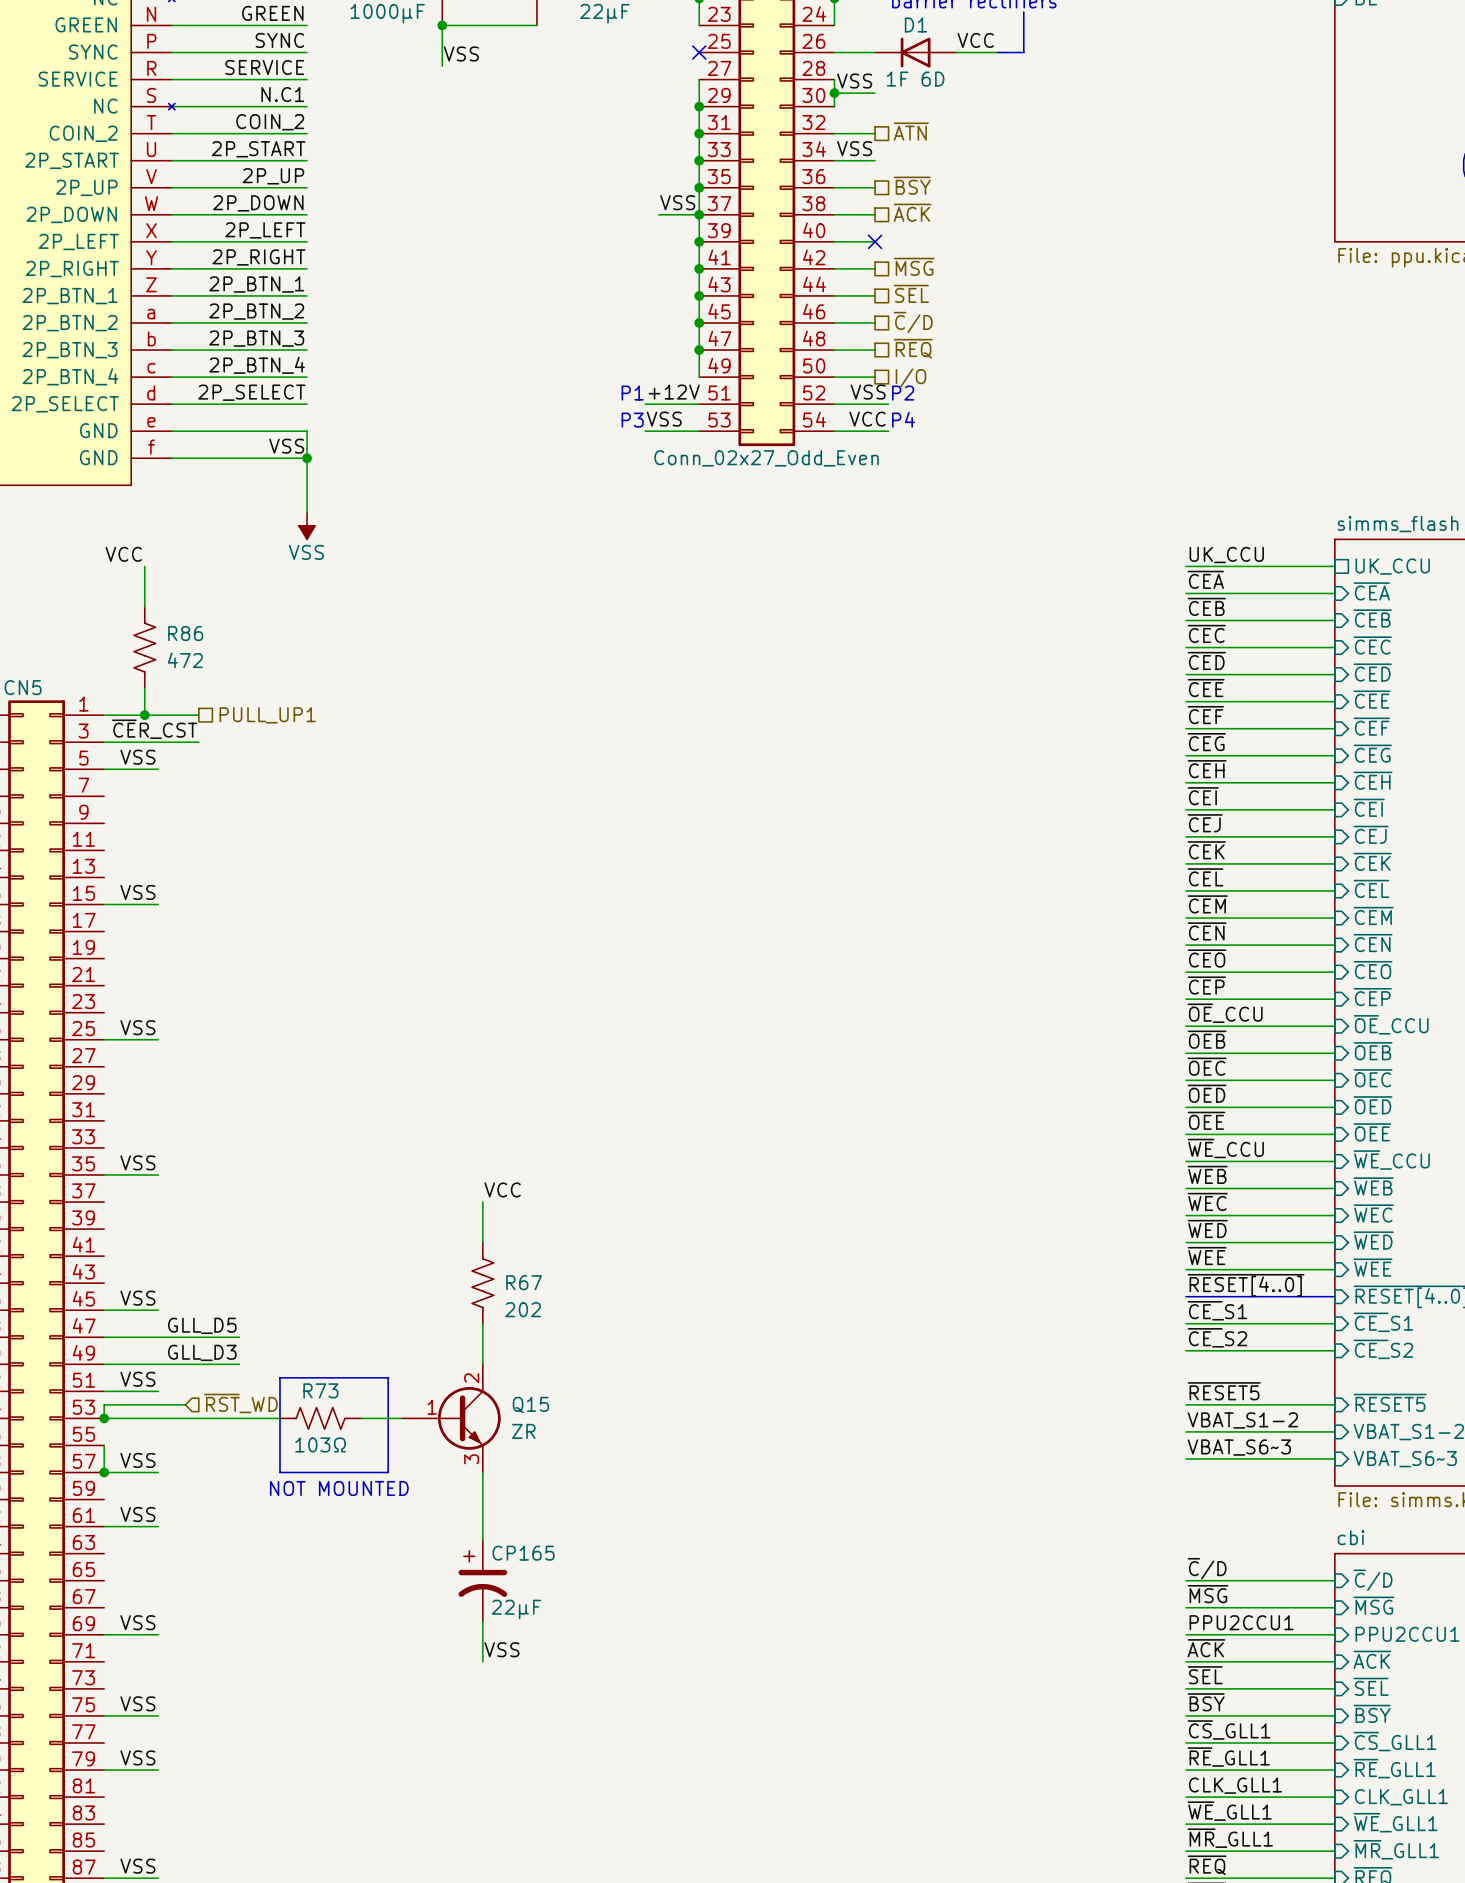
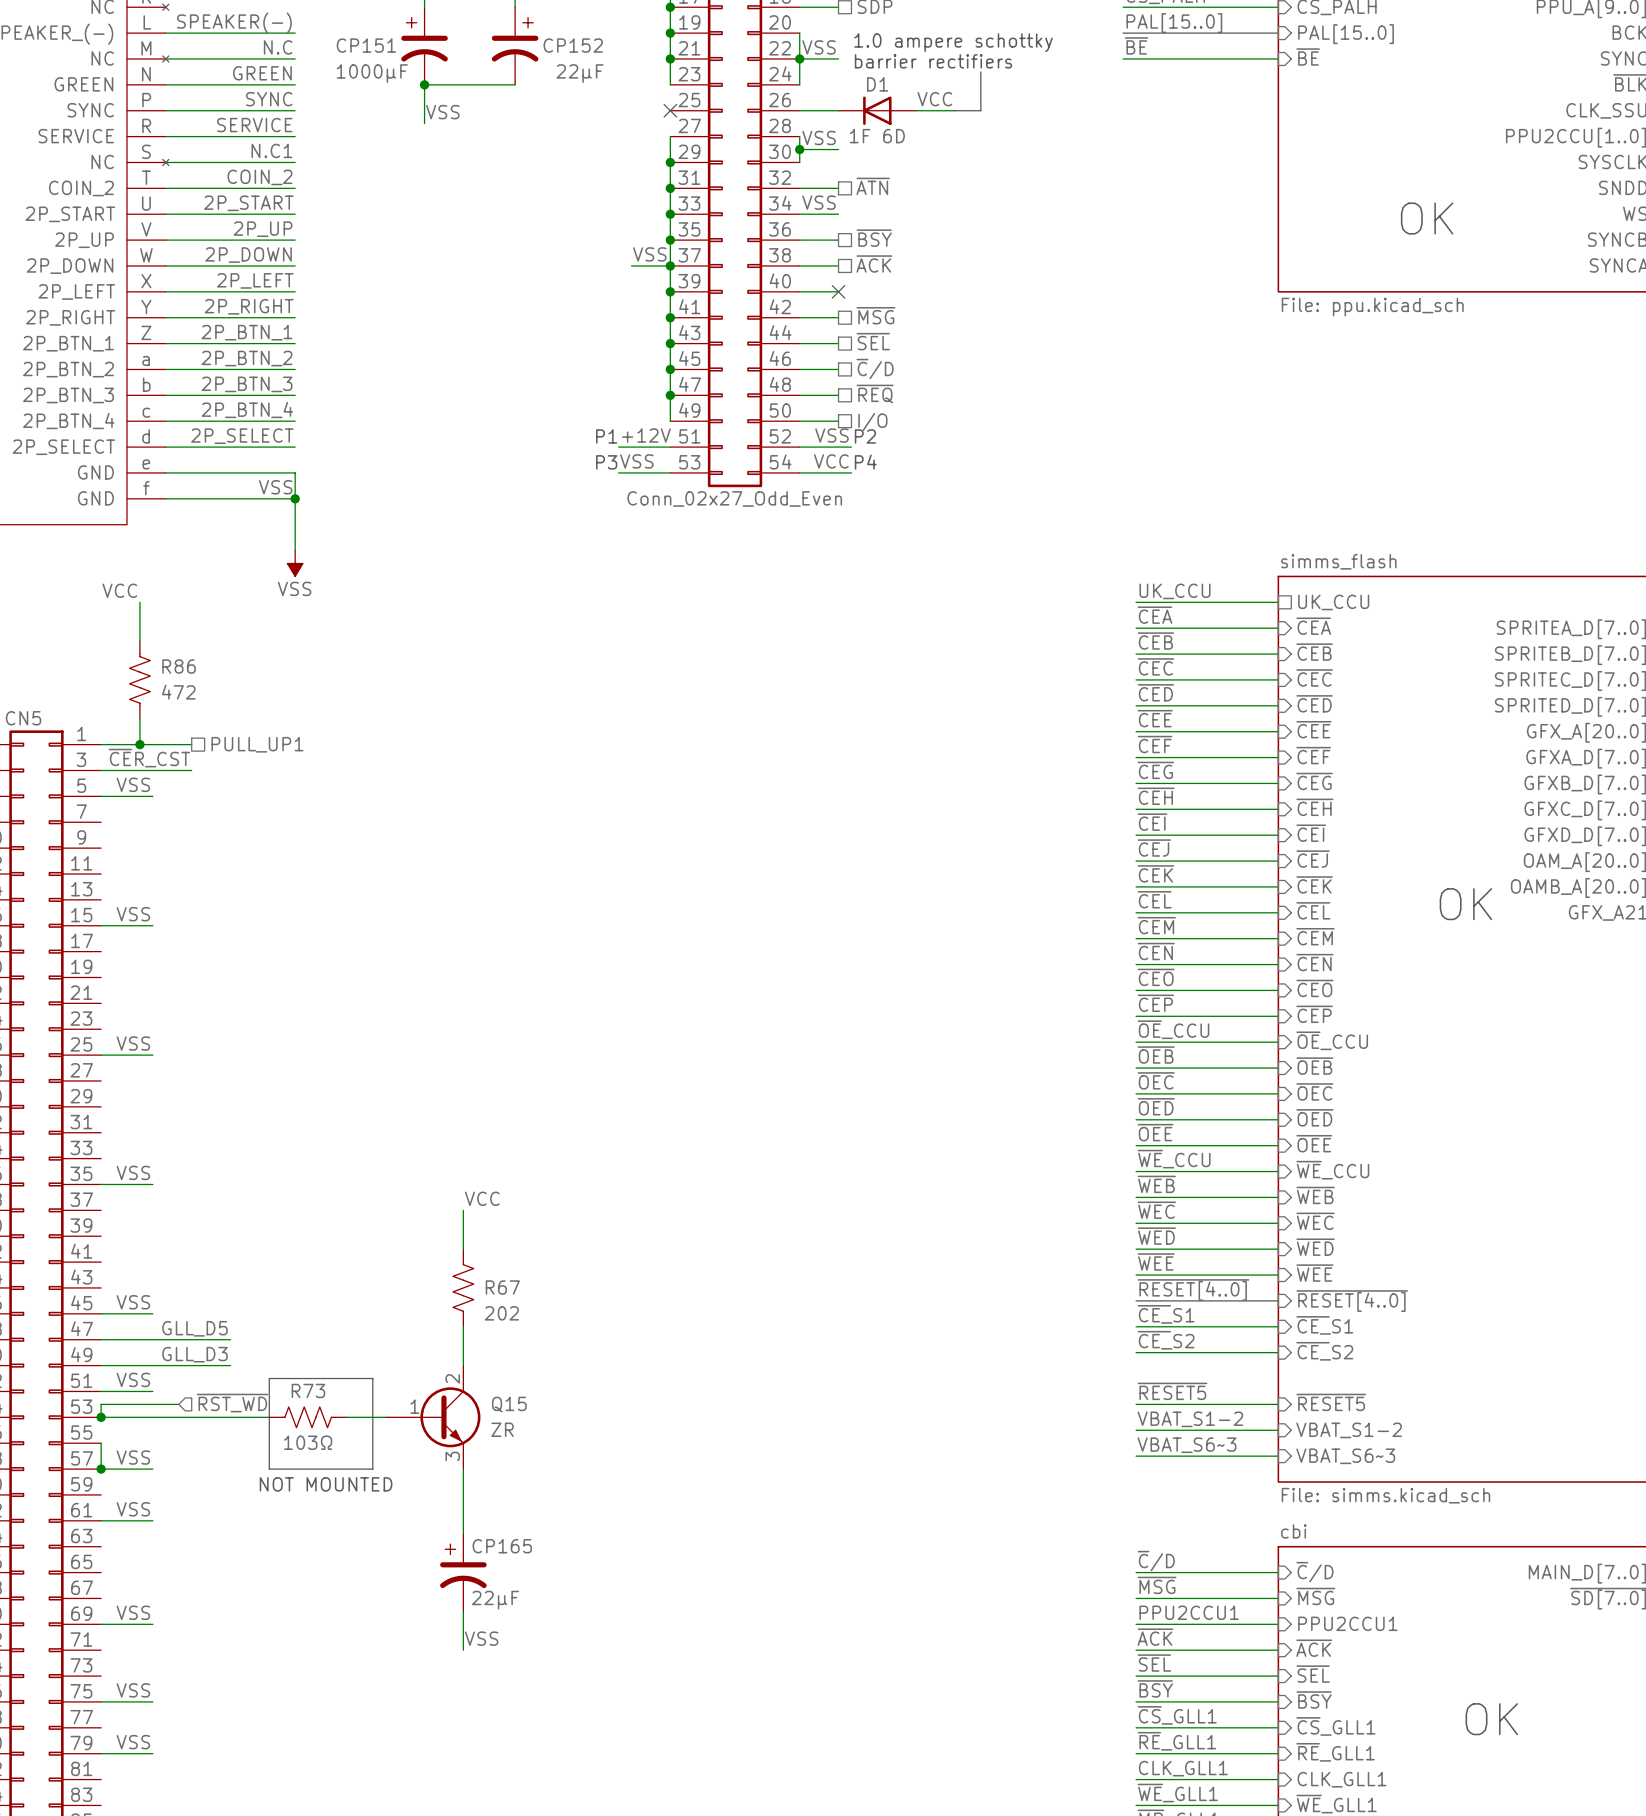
hierarchical label: ~{RST}_WD (240, 1403) -> ~{RST_WD} (232, 1403)

